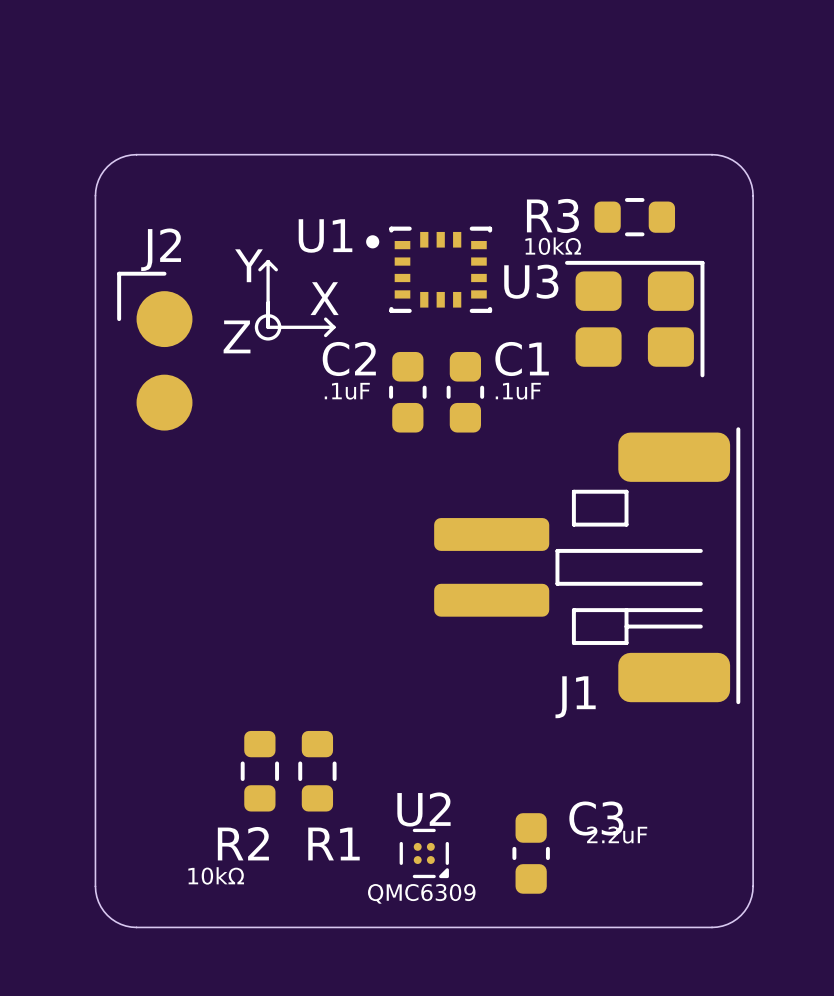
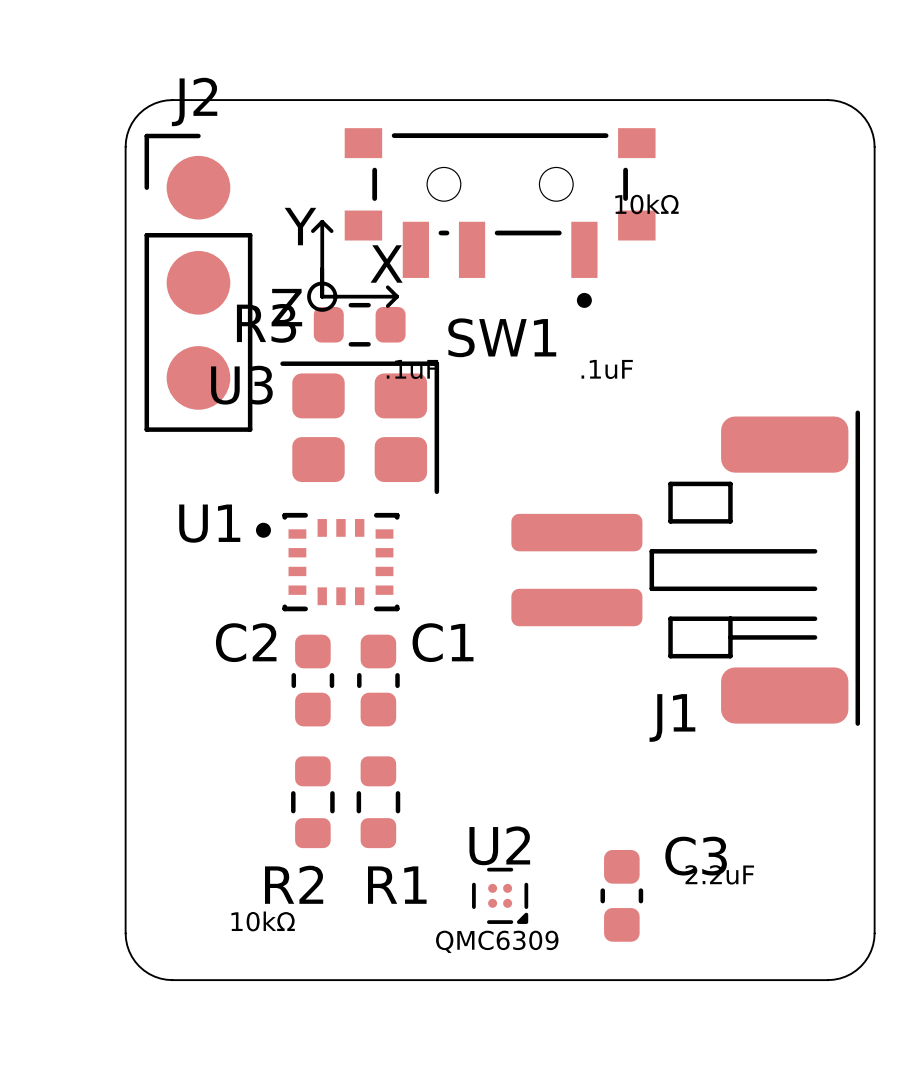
R3 position: (634, 217) -> (359, 324)
SW1: none -> (500, 218)
U1 position: (429, 269) -> (327, 562)
J2 footprint: [117, 271, 193, 431] -> [144, 133, 253, 432]
U3 position: (634, 319) -> (359, 427)
C2 position: (407, 392) -> (312, 680)
C1 position: (465, 392) -> (378, 680)

